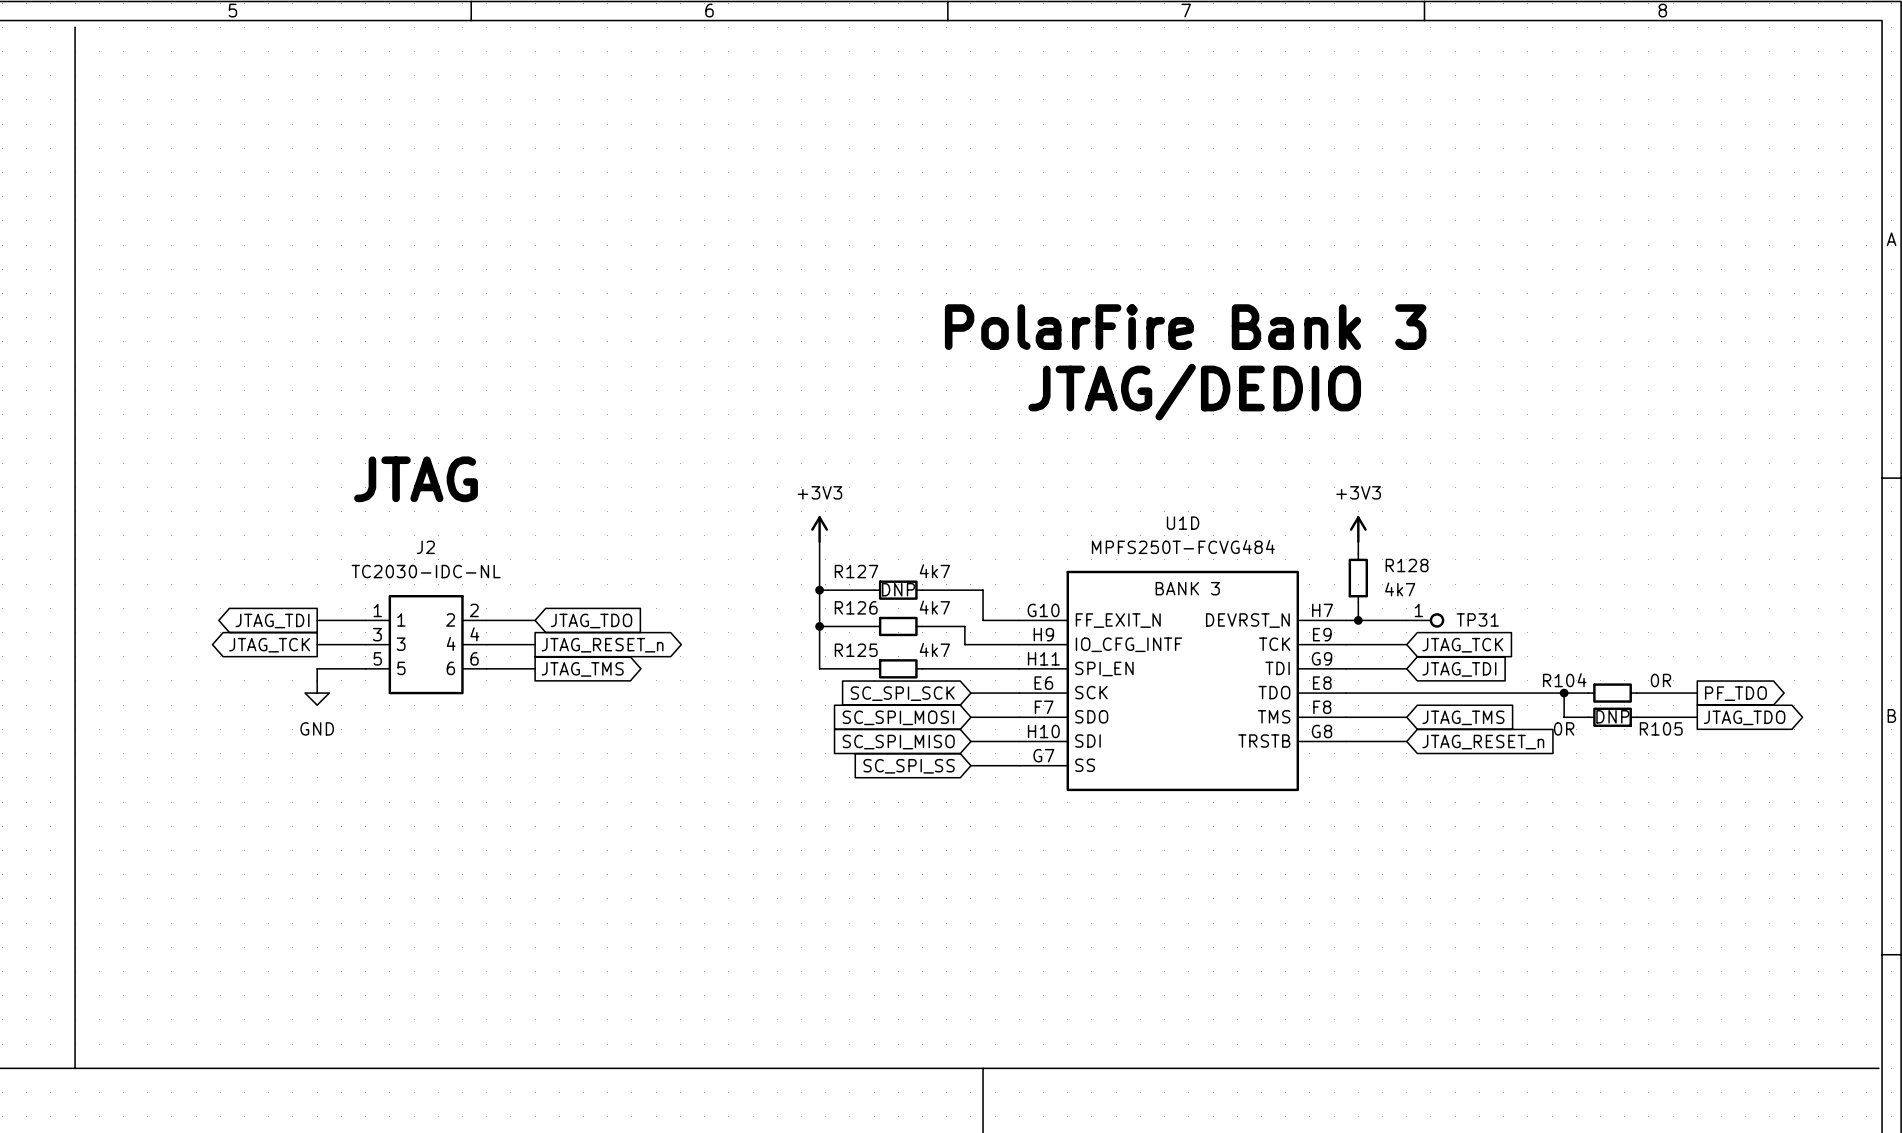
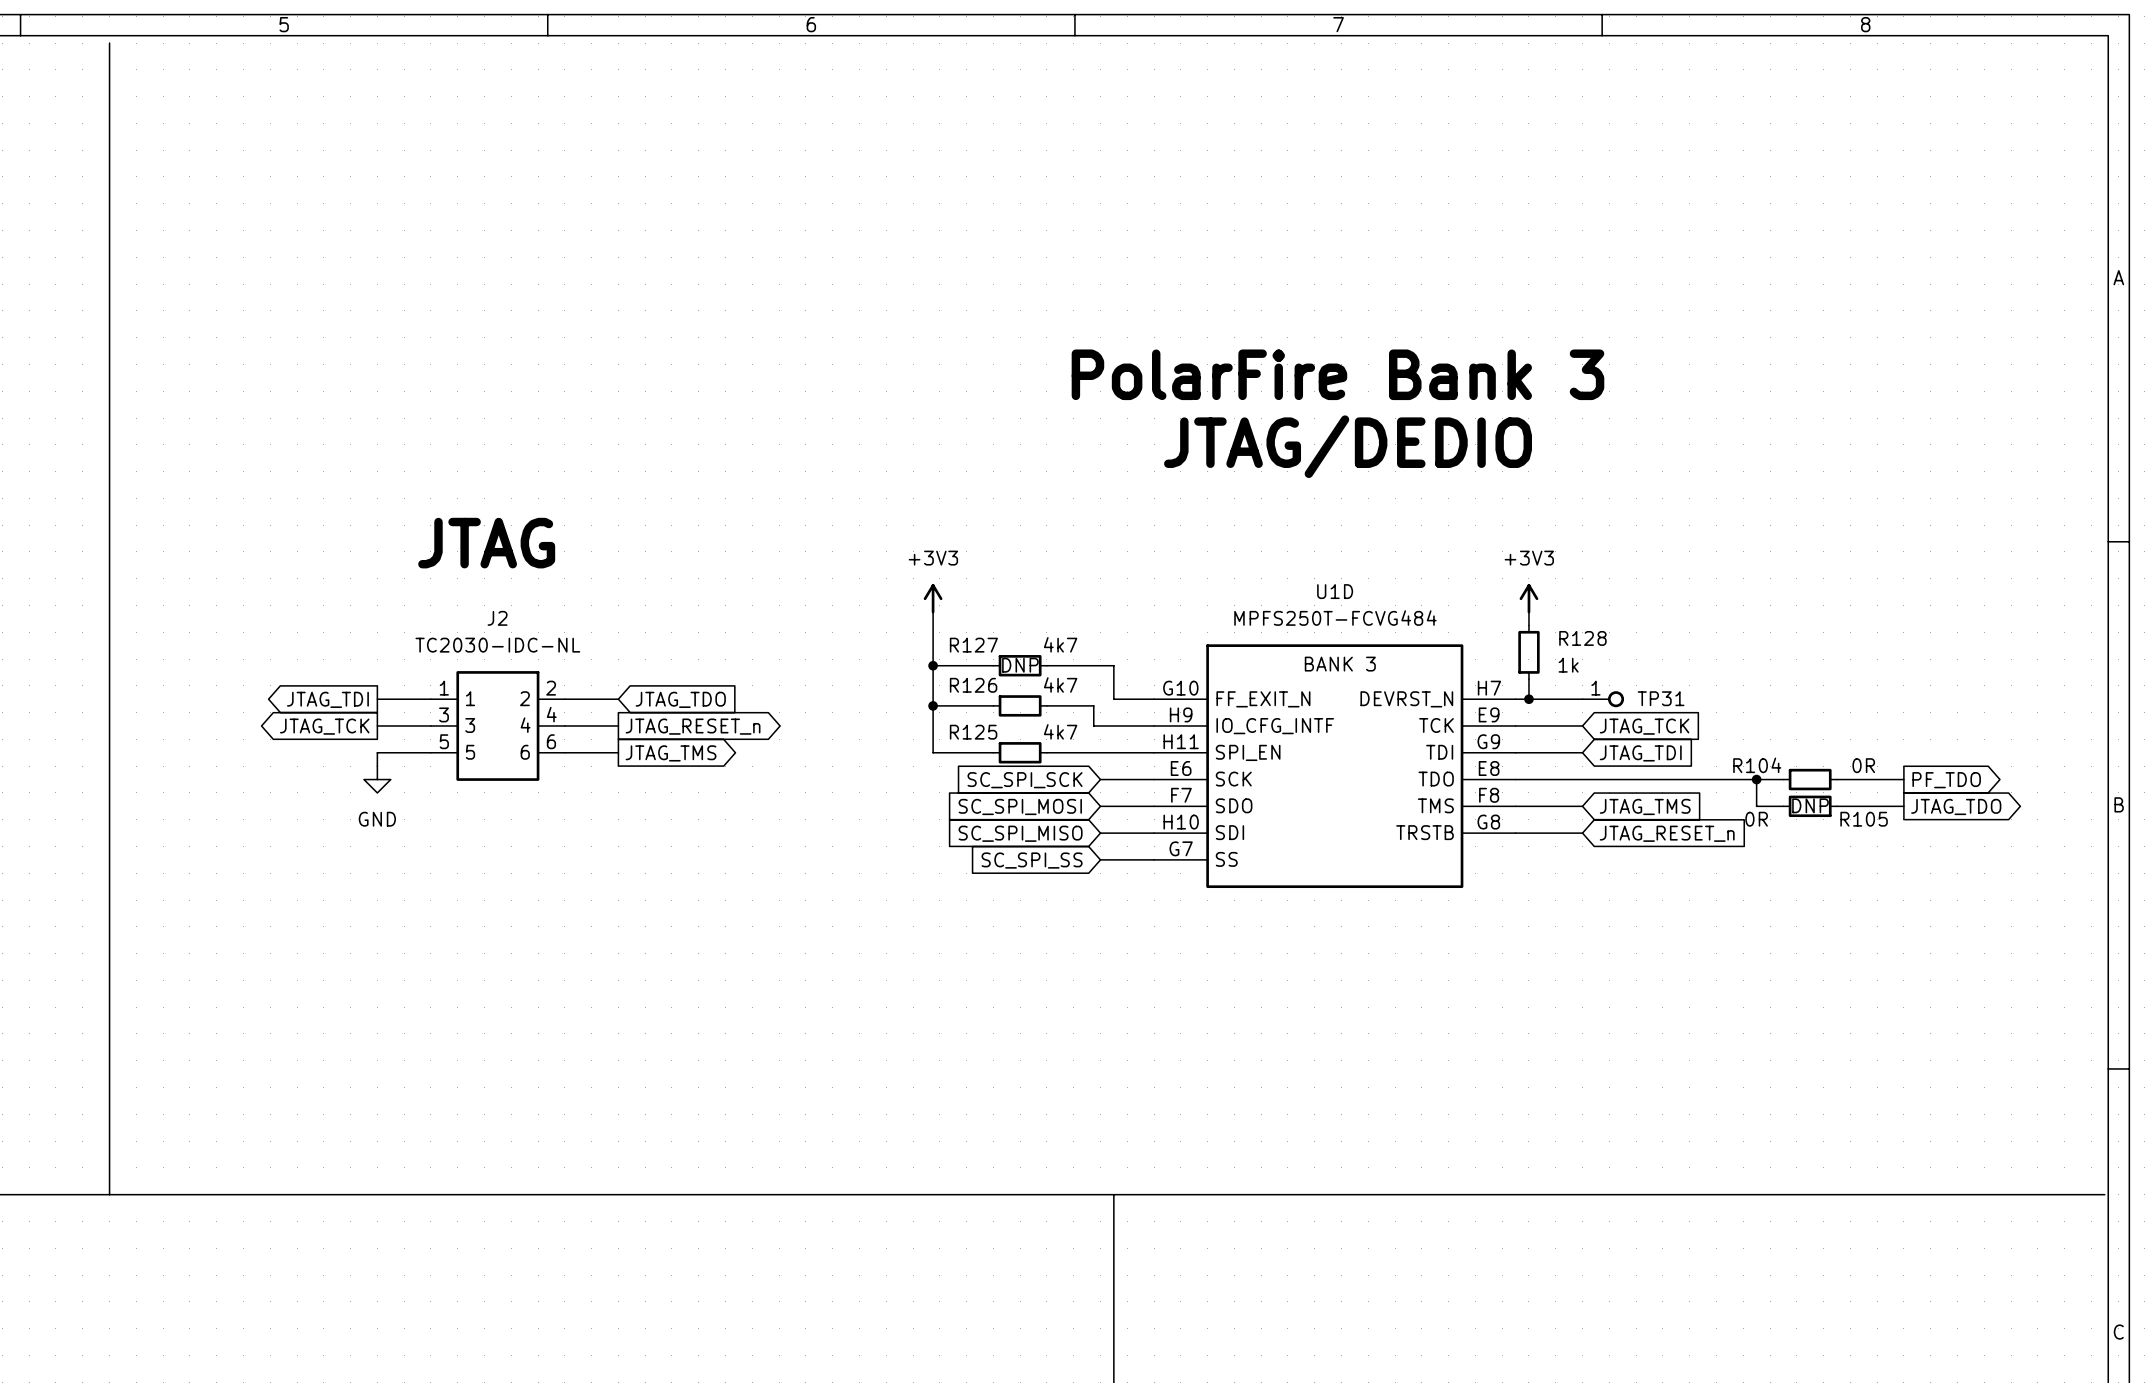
R128 text: 4k7 (1400, 589) -> 1k (1568, 665)

